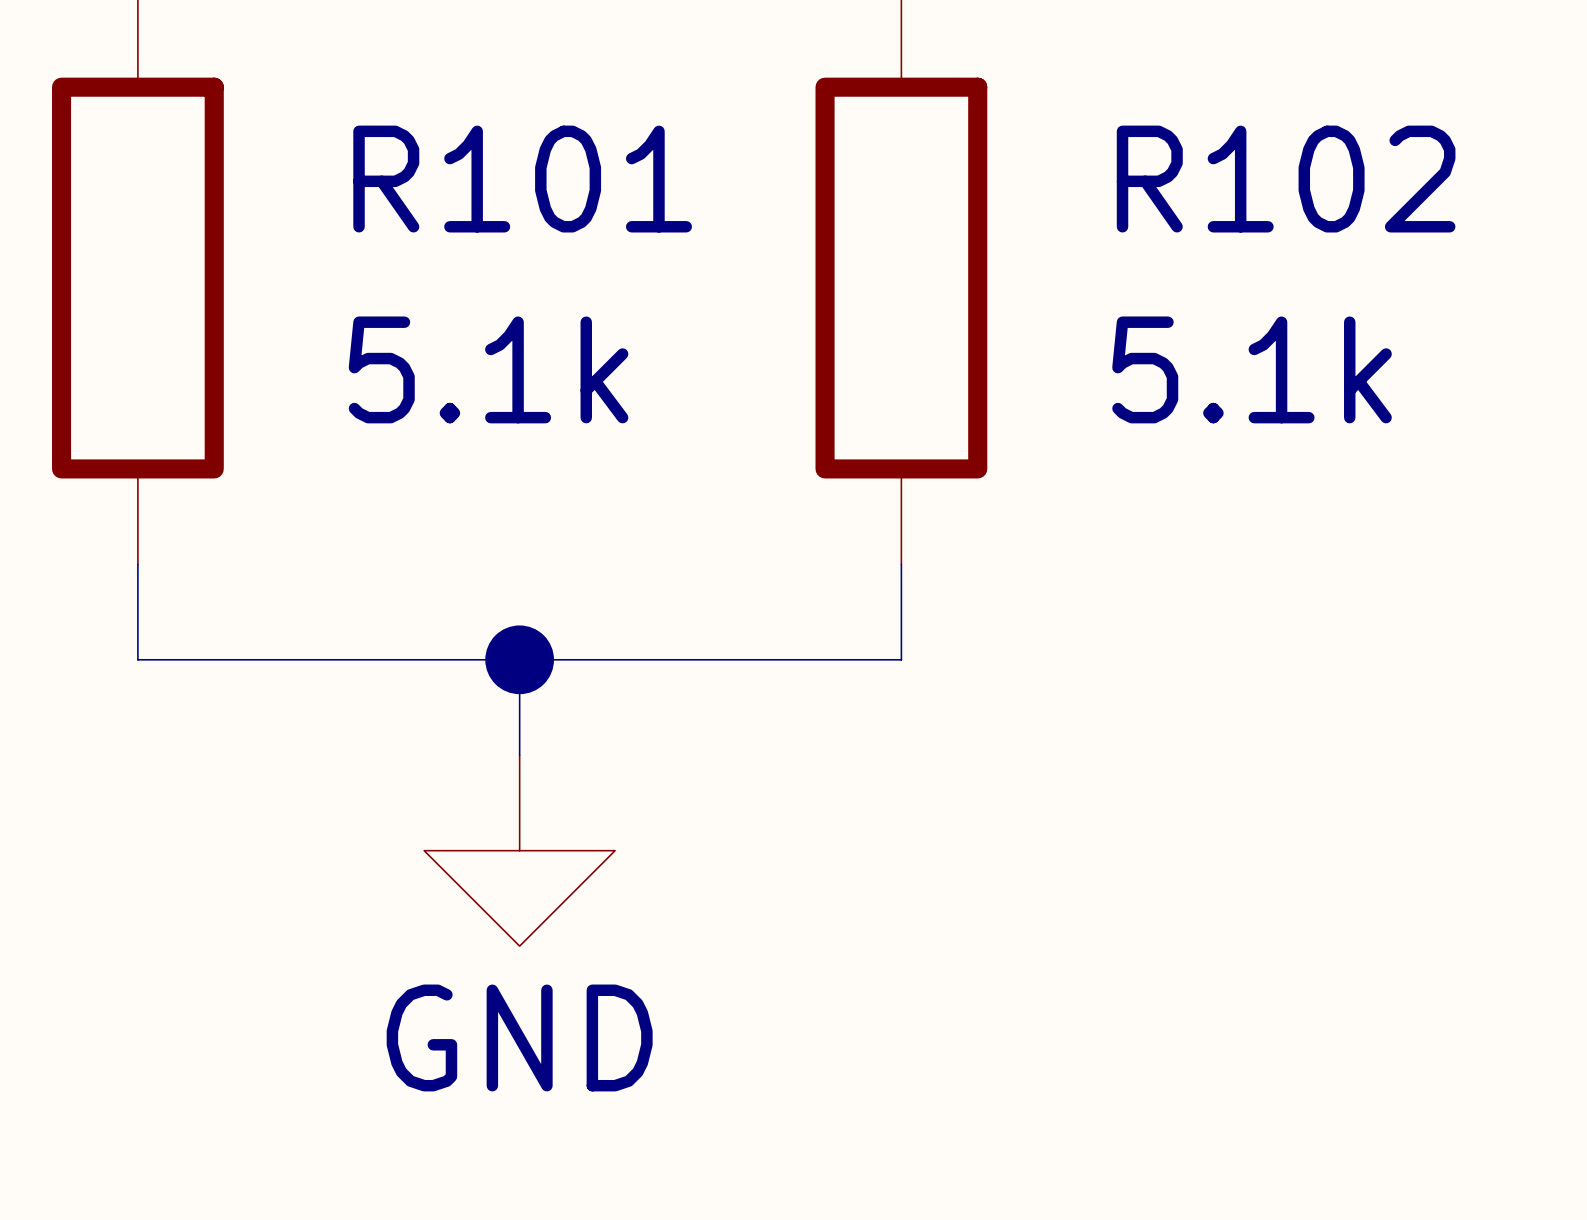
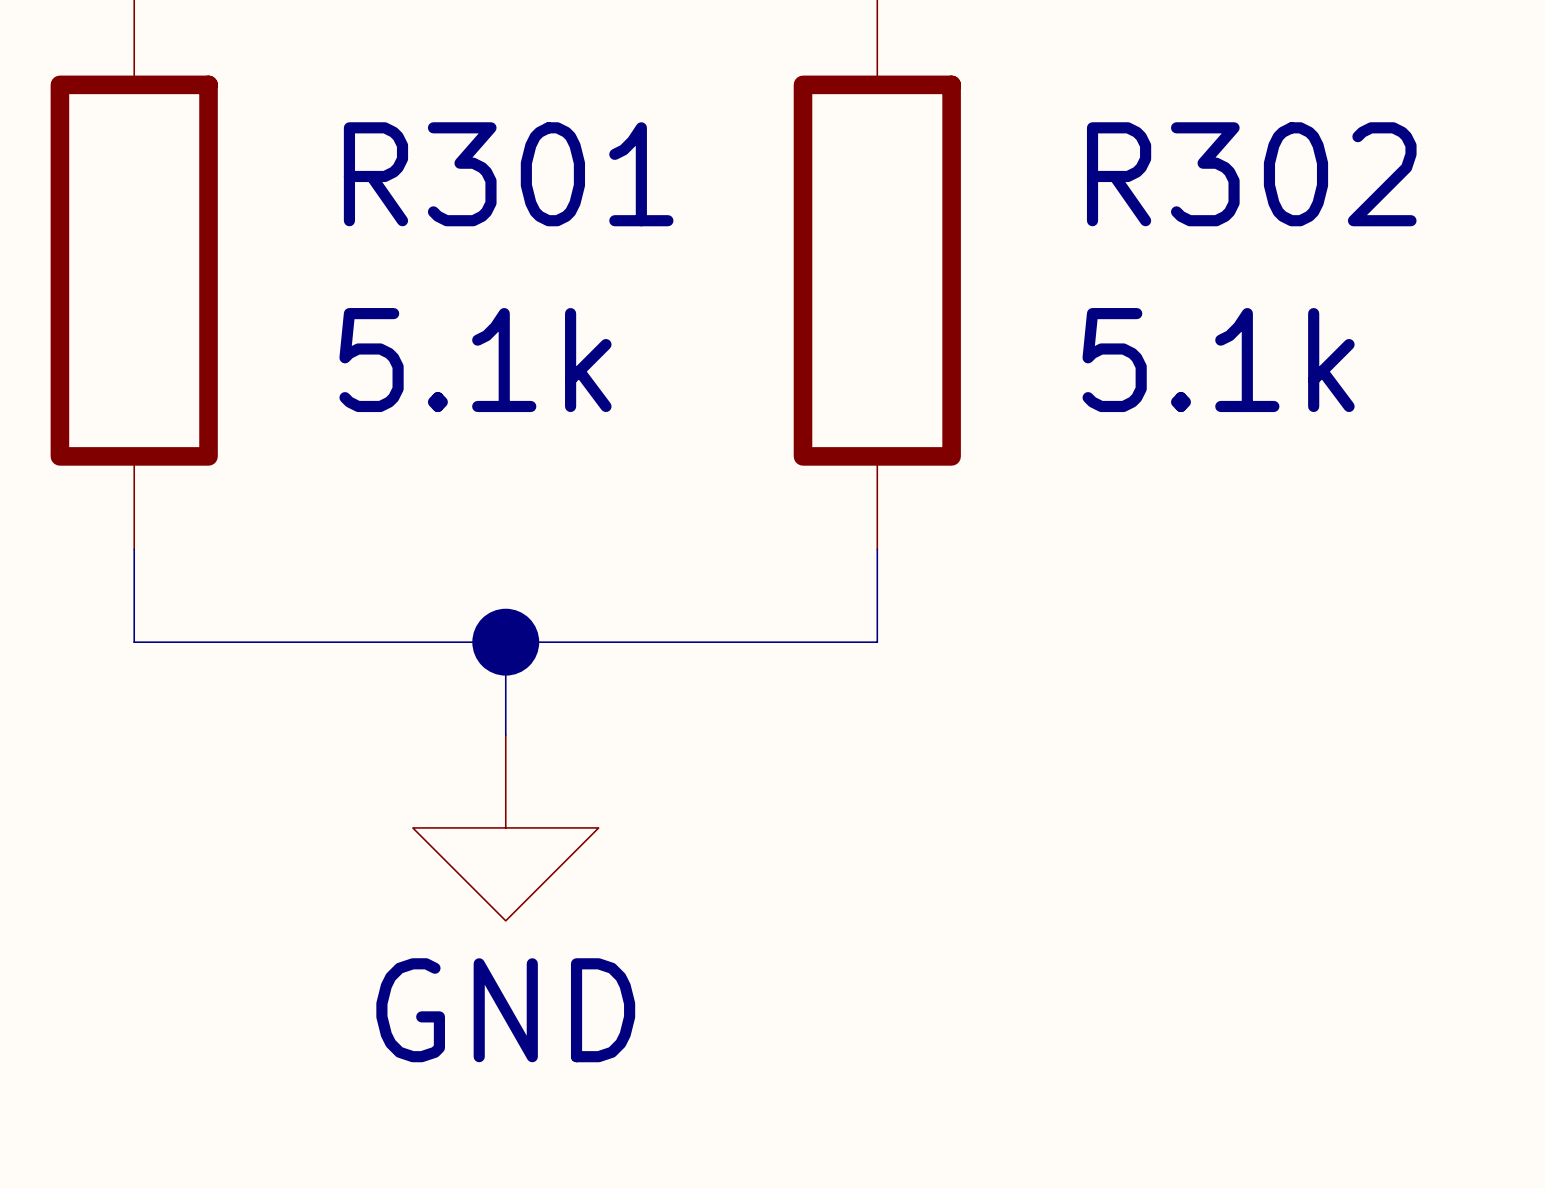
R101 name: R101 (522, 179) -> R301 (508, 174)
R102 name: R102 (1286, 179) -> R302 (1251, 174)

